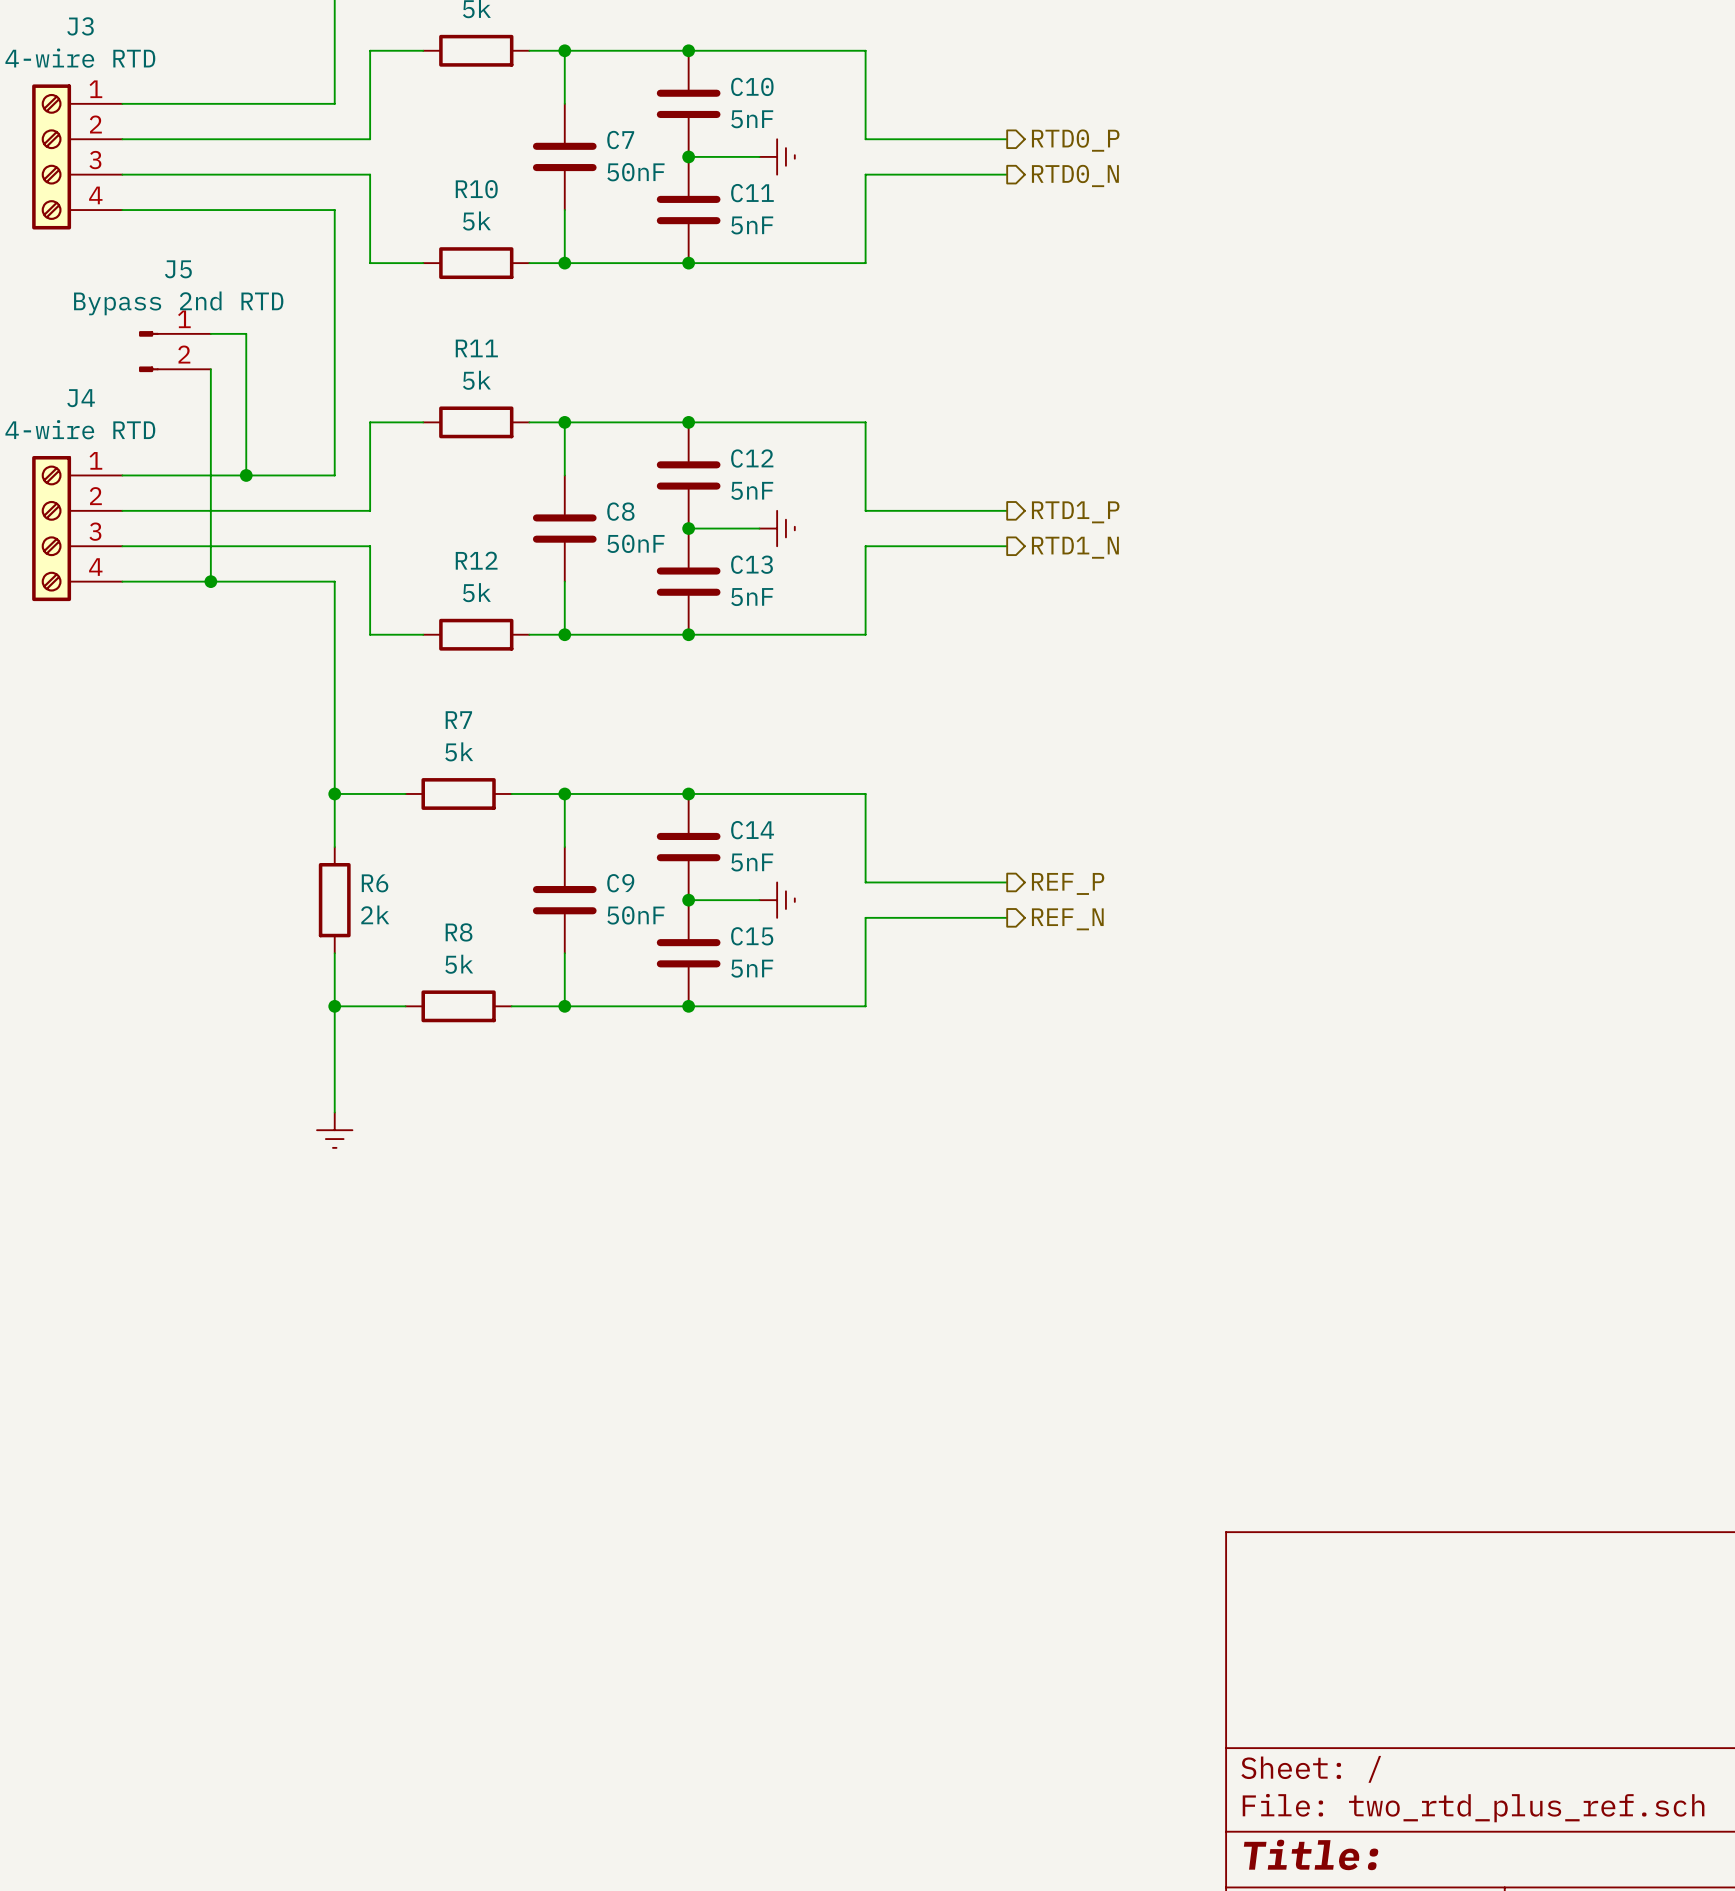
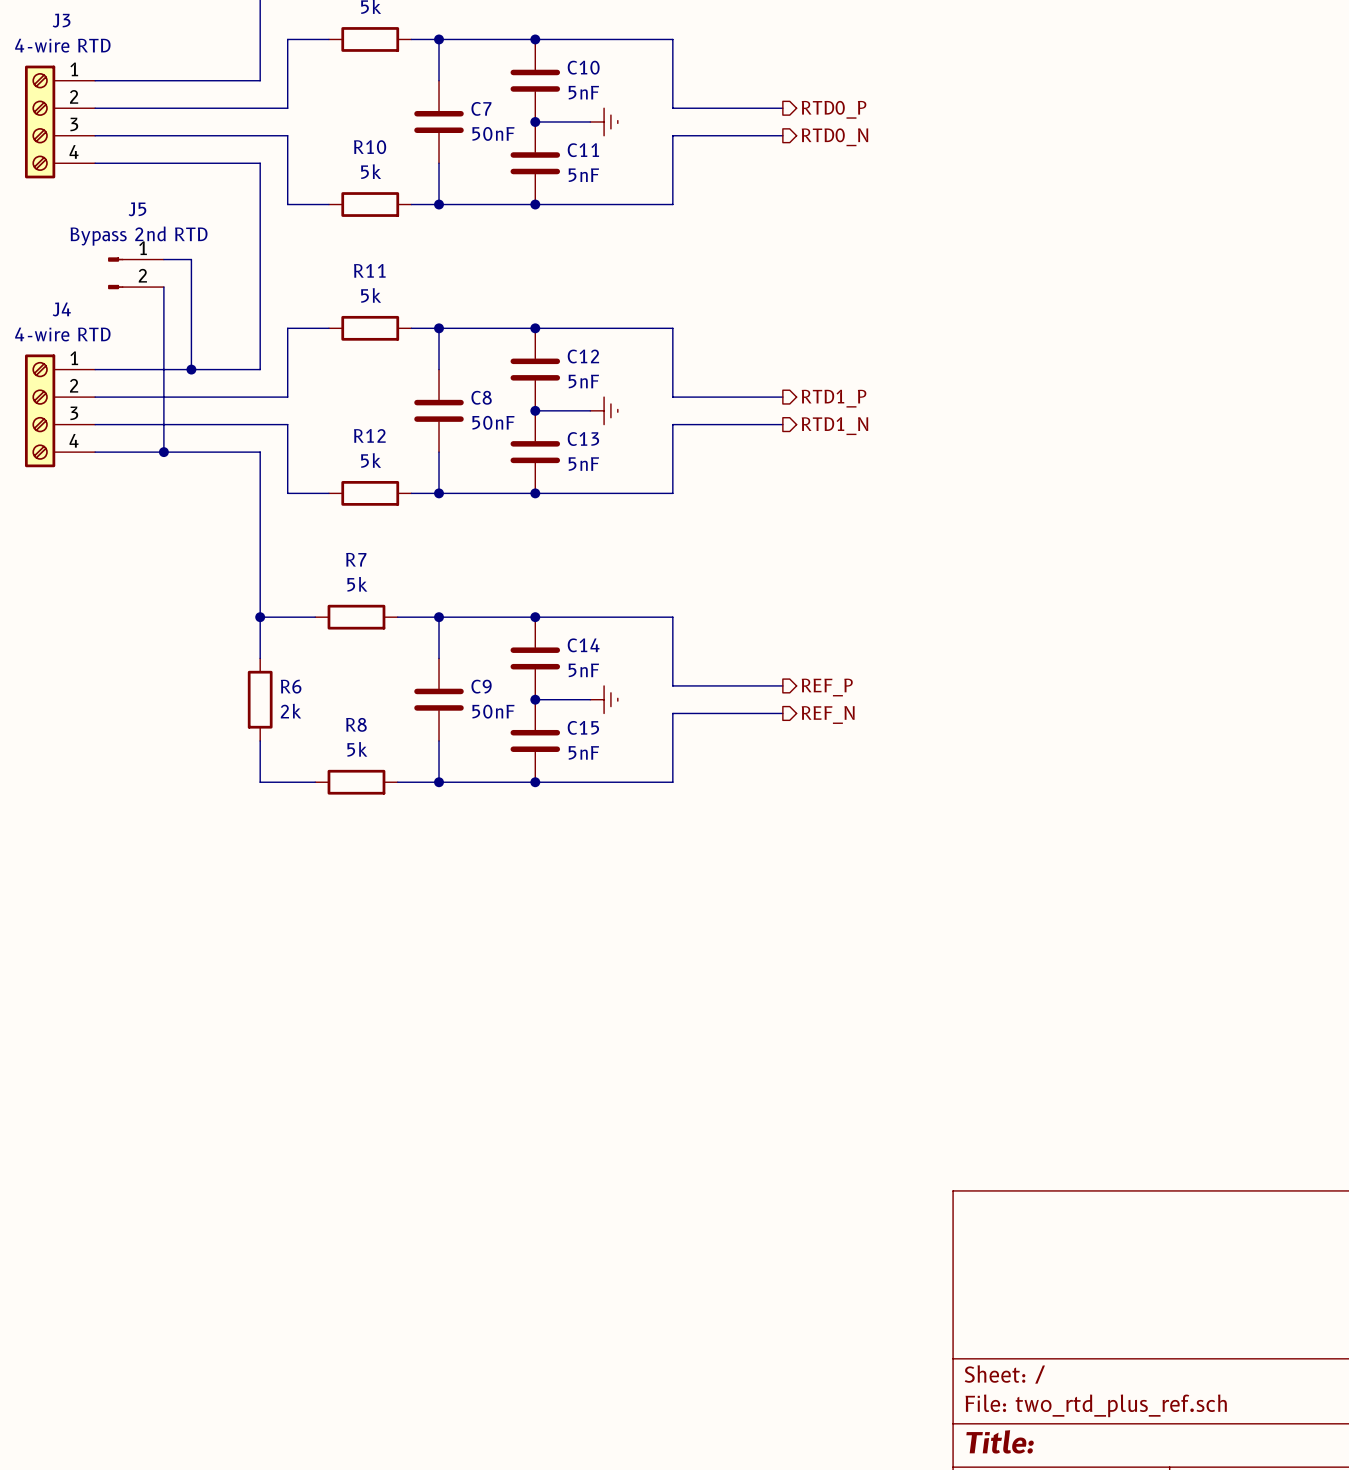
wire: (334, 1006) (334, 1112) -> none
junction: (334, 1006) -> none
power symbol: (334, 1130) -> none

